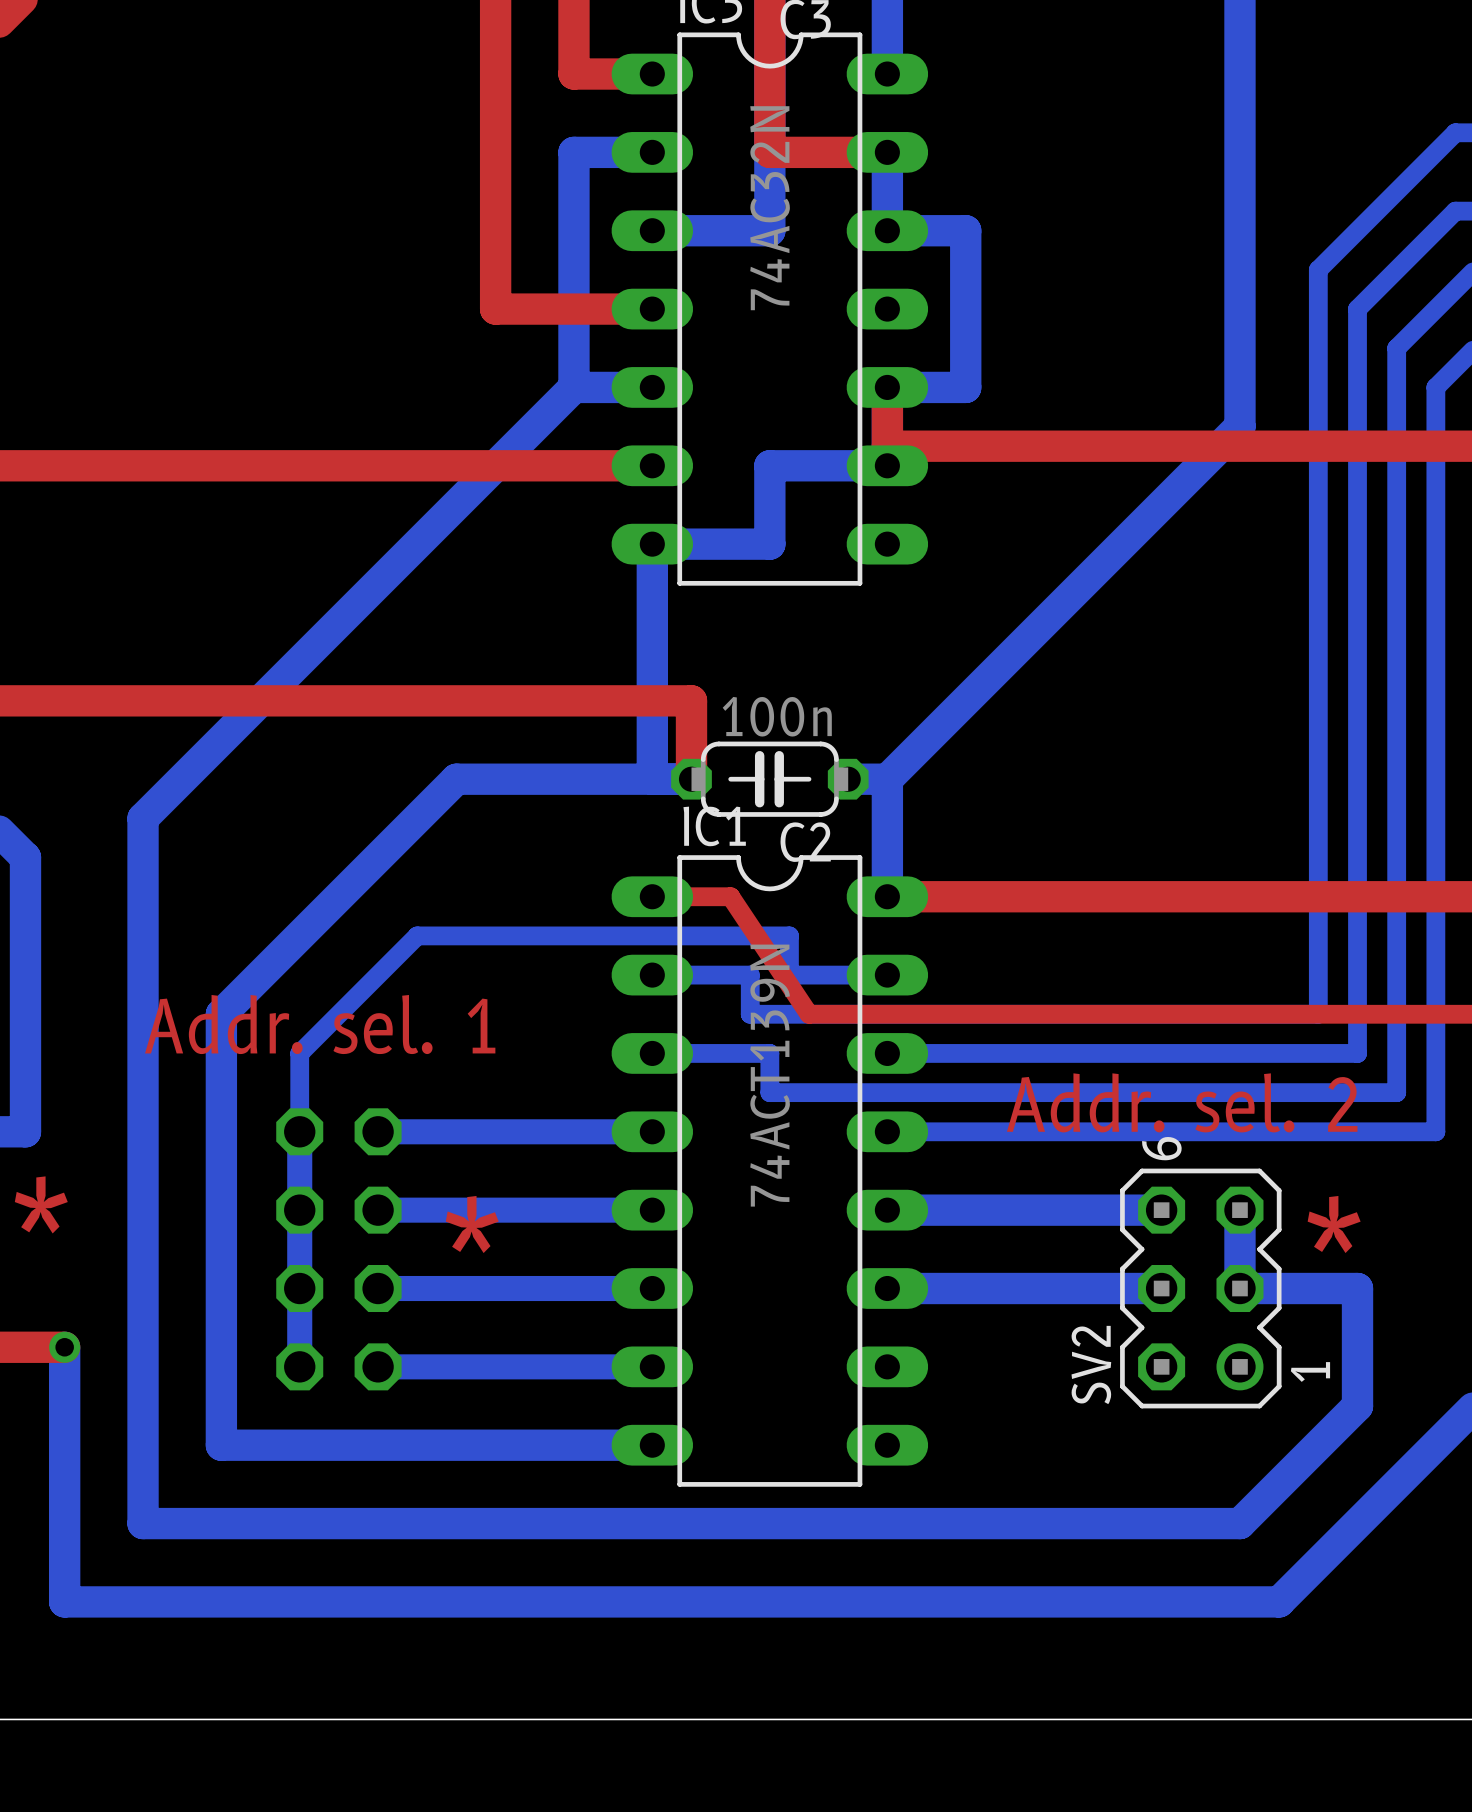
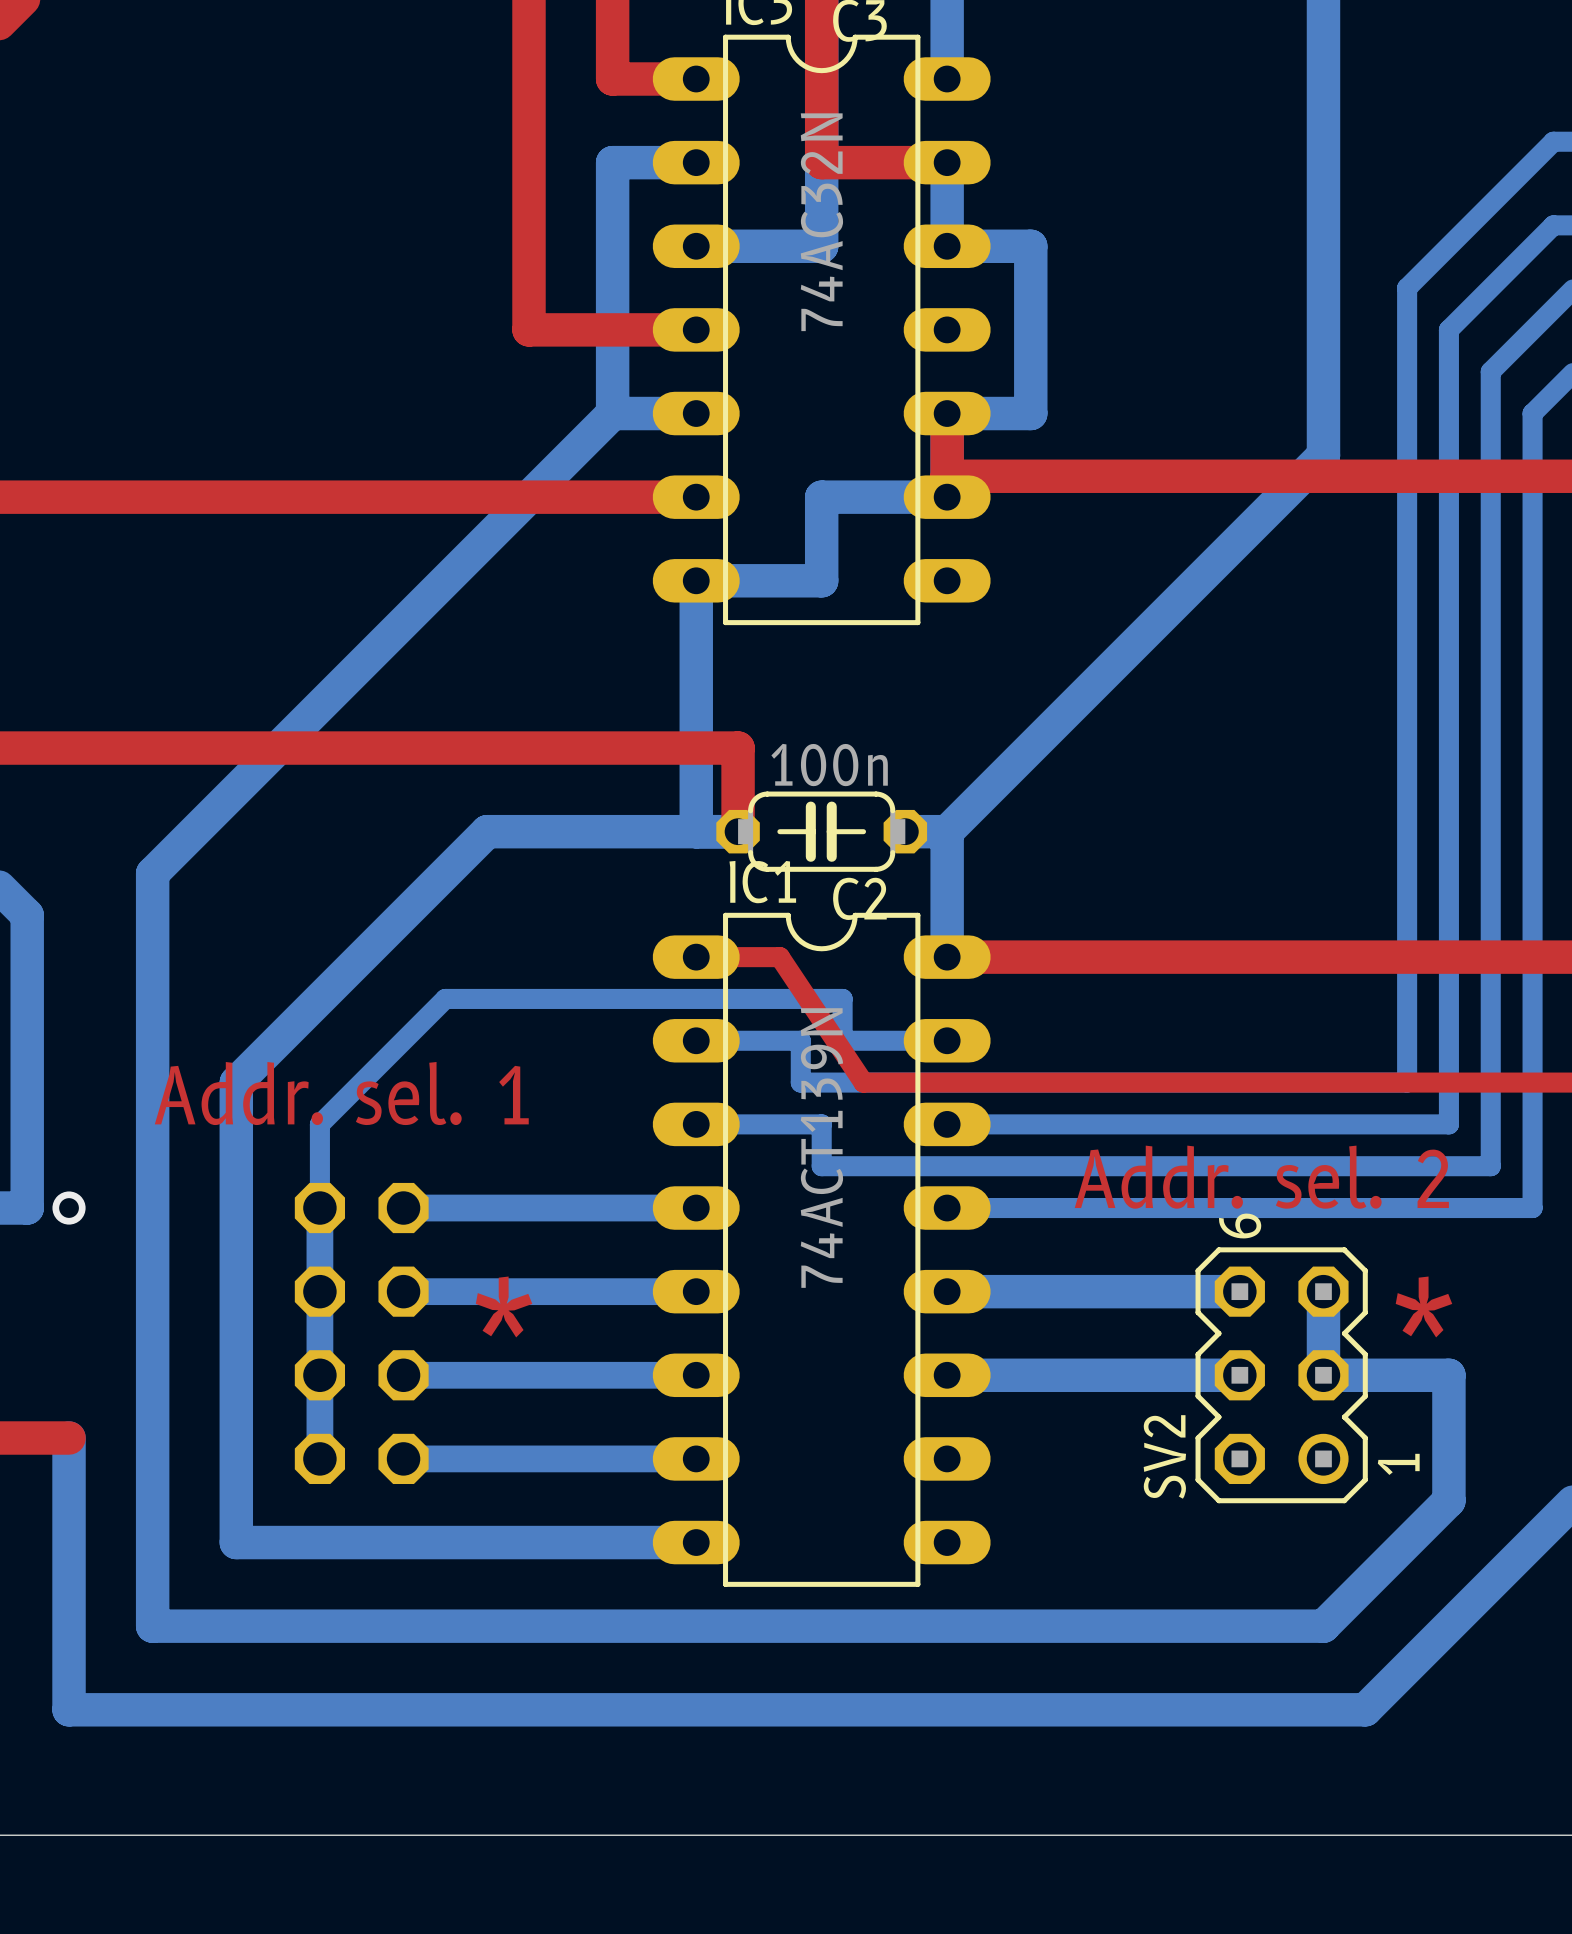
via: none -> (69, 1208)
text: * (41, 1204) -> none
via: (64, 1347) -> none

